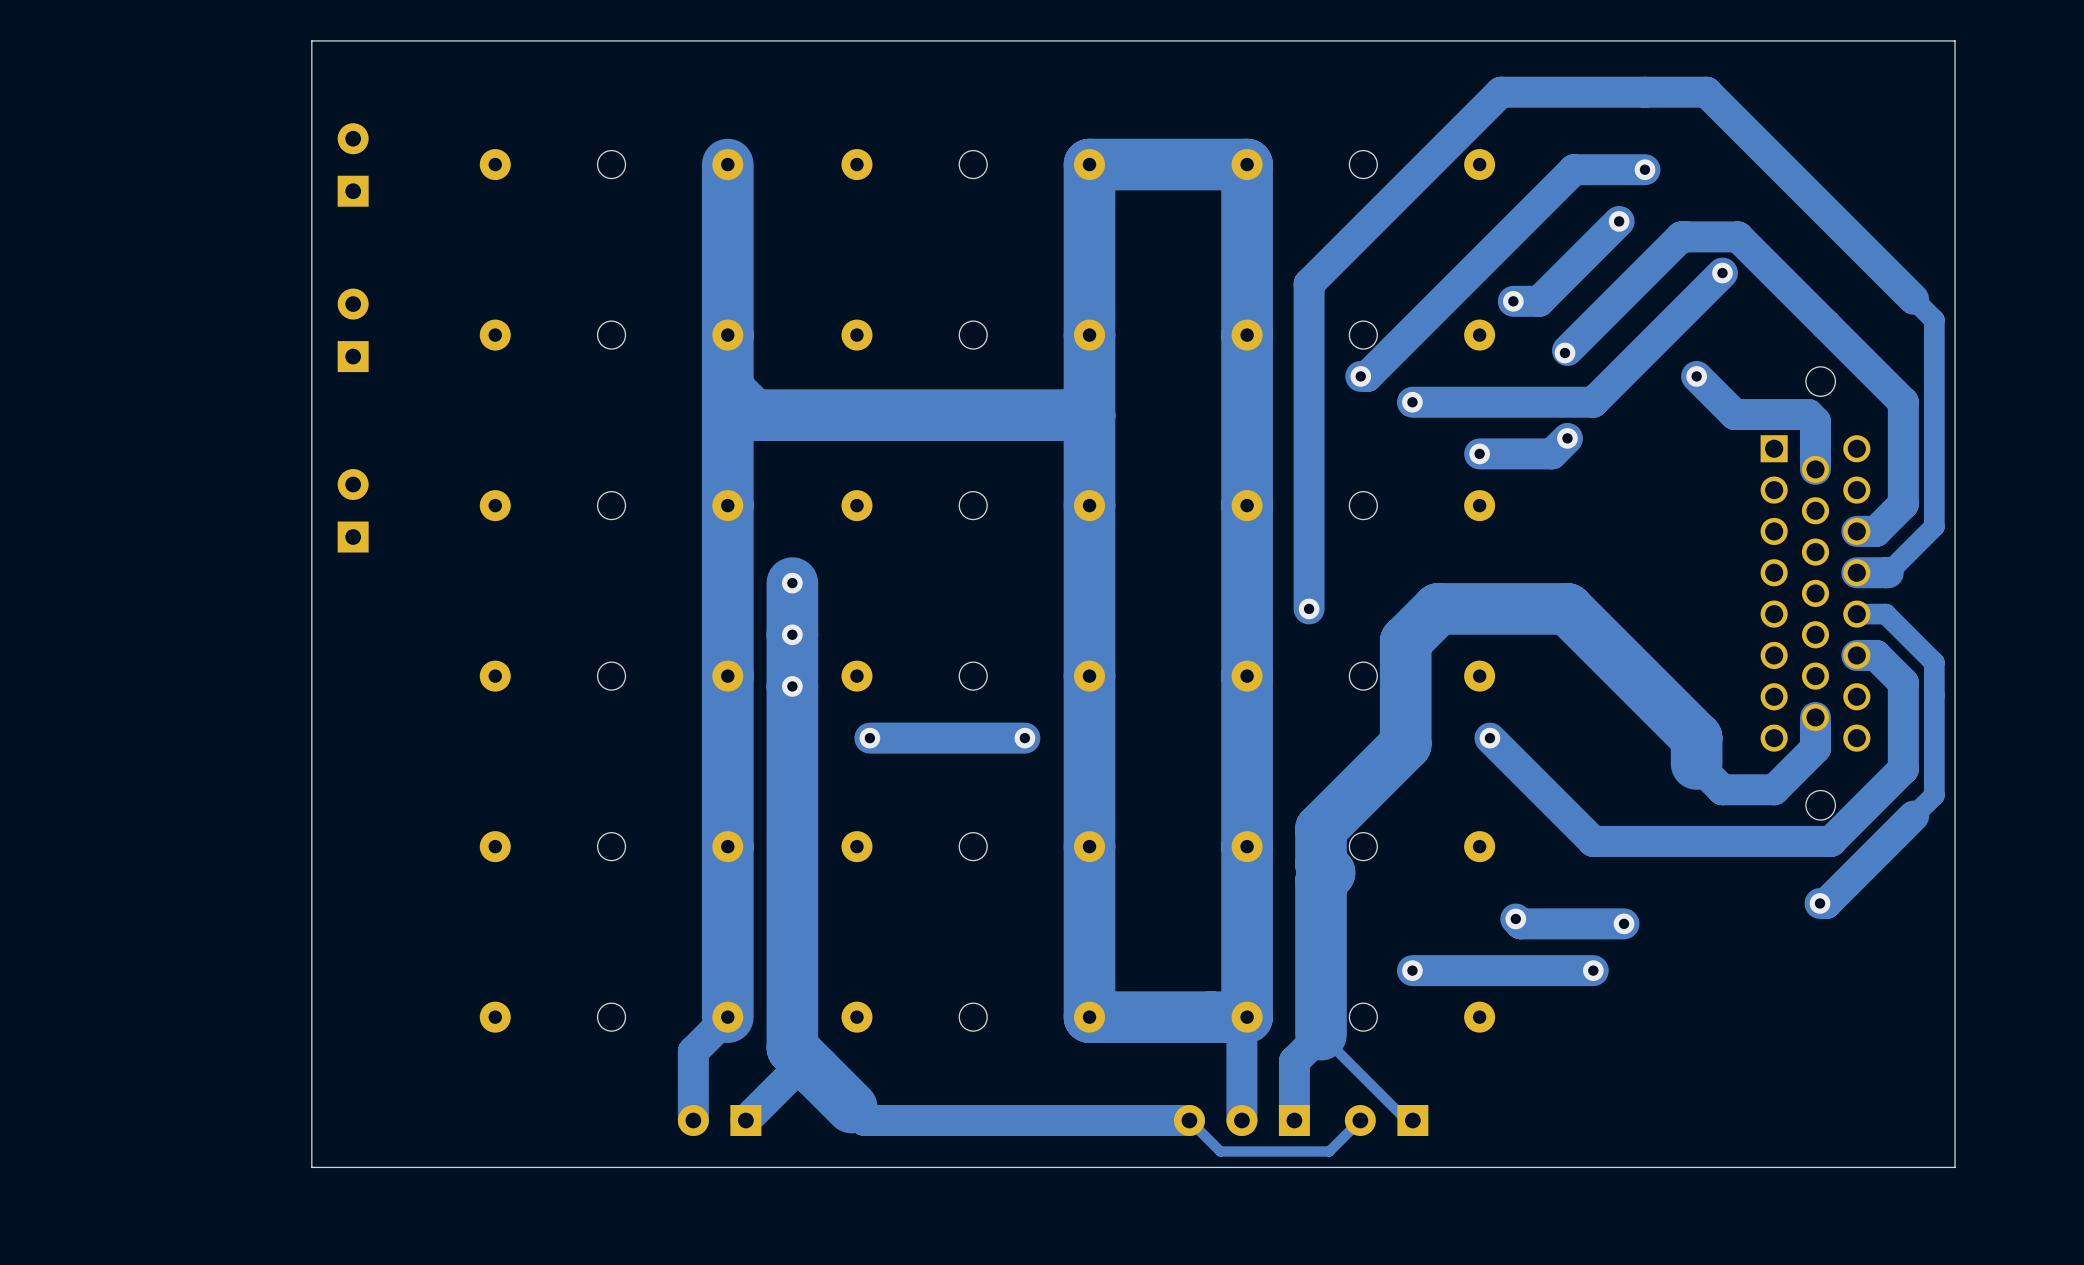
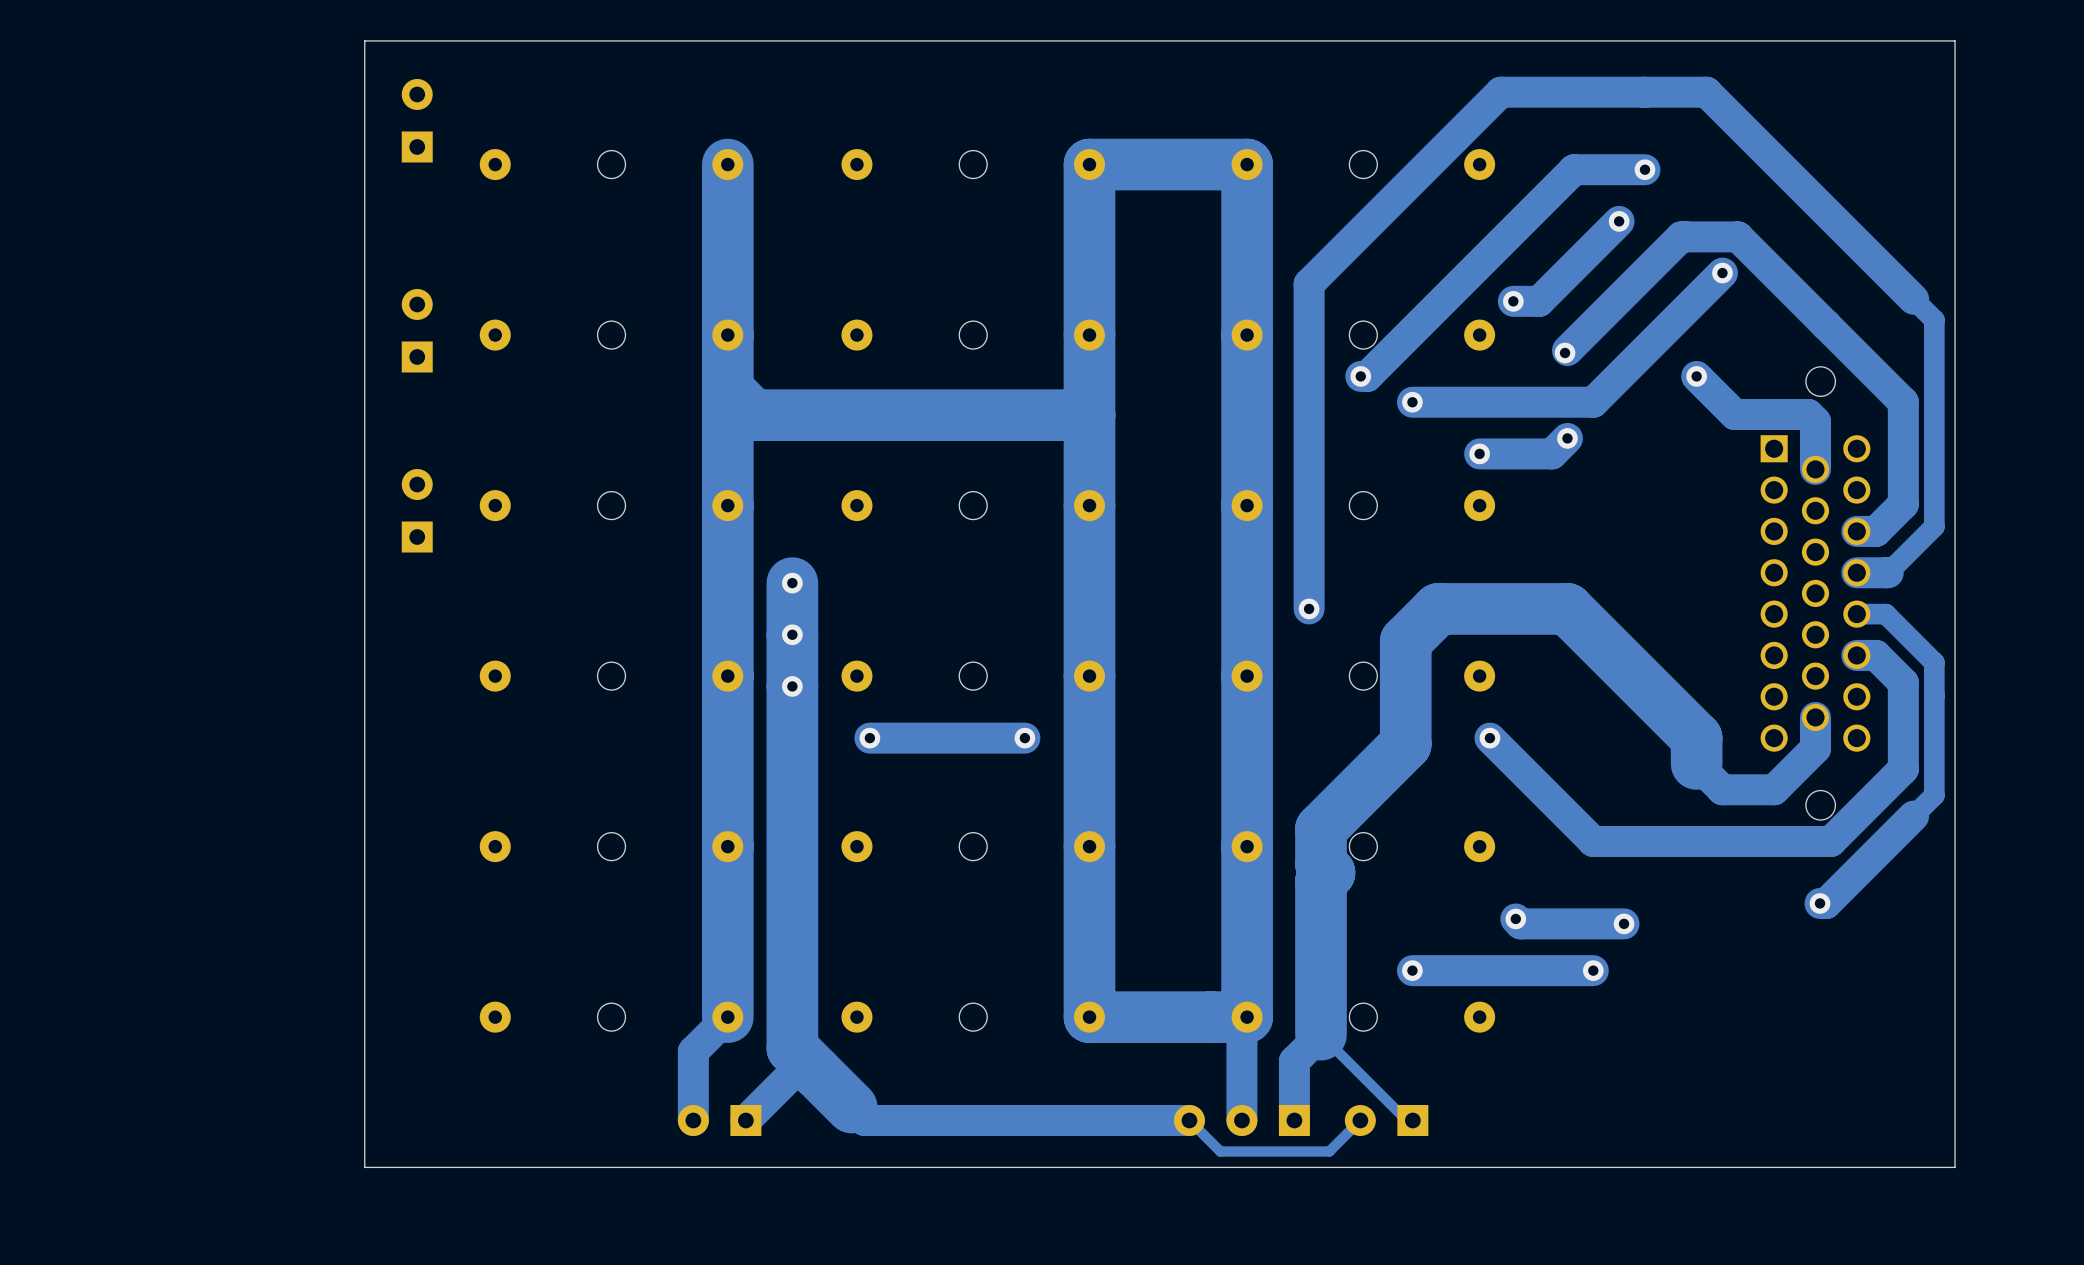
board edge: (364, 40) (311, 40) (311, 1167) (364, 1167) -> (364, 40) (364, 1167)
part position: (353, 164) -> (417, 120)
part position: (353, 330) -> (417, 330)
part position: (353, 510) -> (417, 510)

